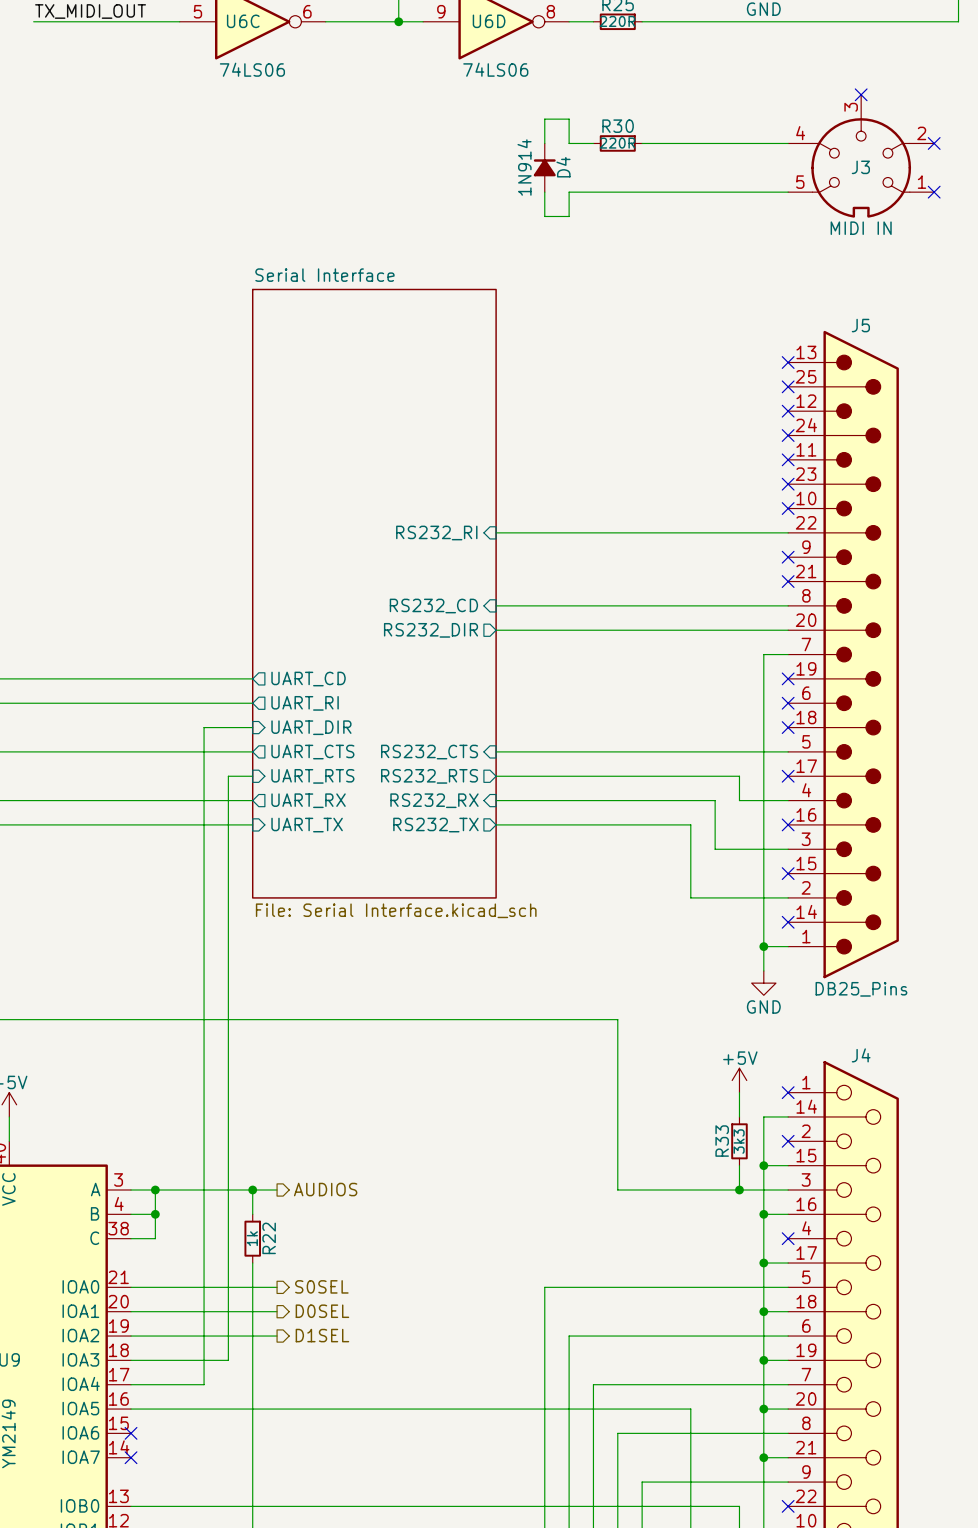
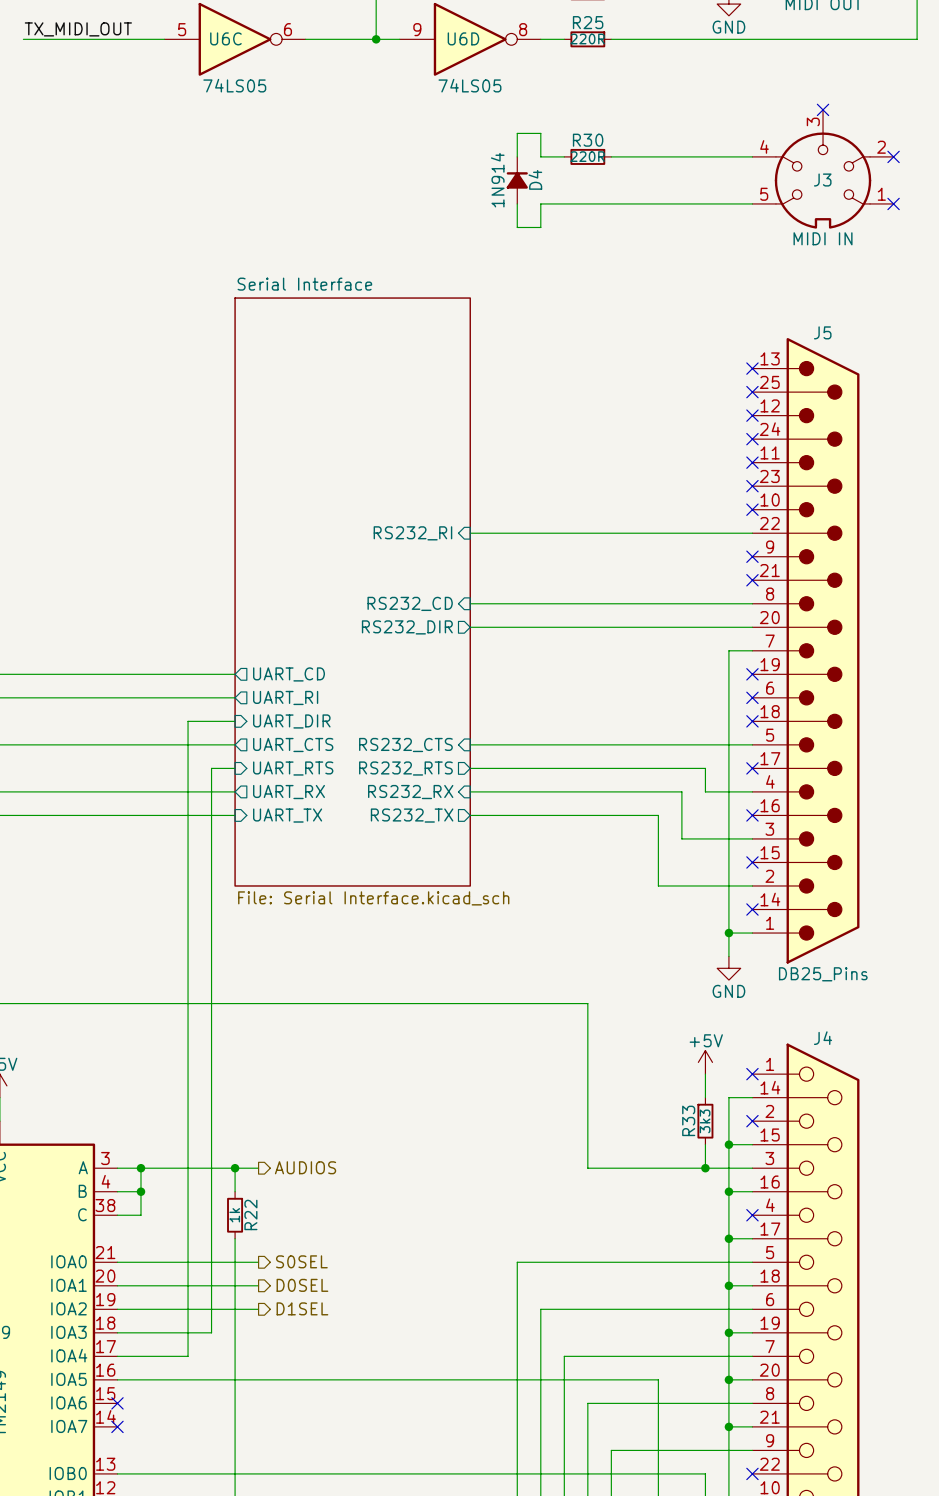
U6C value: 74LS06 (252, 69) -> 74LS05 (234, 85)
U6D value: 74LS06 (495, 69) -> 74LS05 (469, 85)

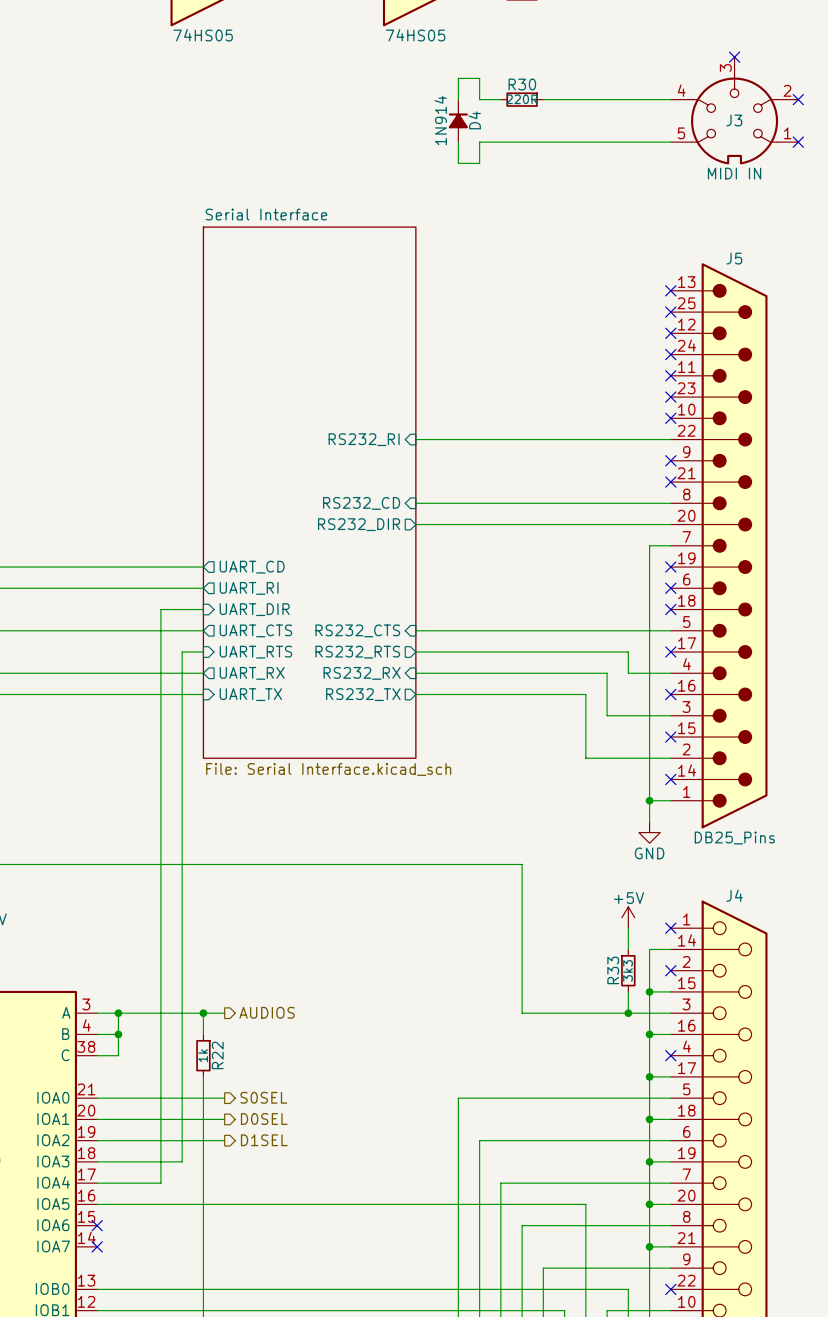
U6C value: 74LS05 (234, 85) -> 74HS05 (203, 35)
U6D value: 74LS05 (469, 85) -> 74HS05 (415, 35)

